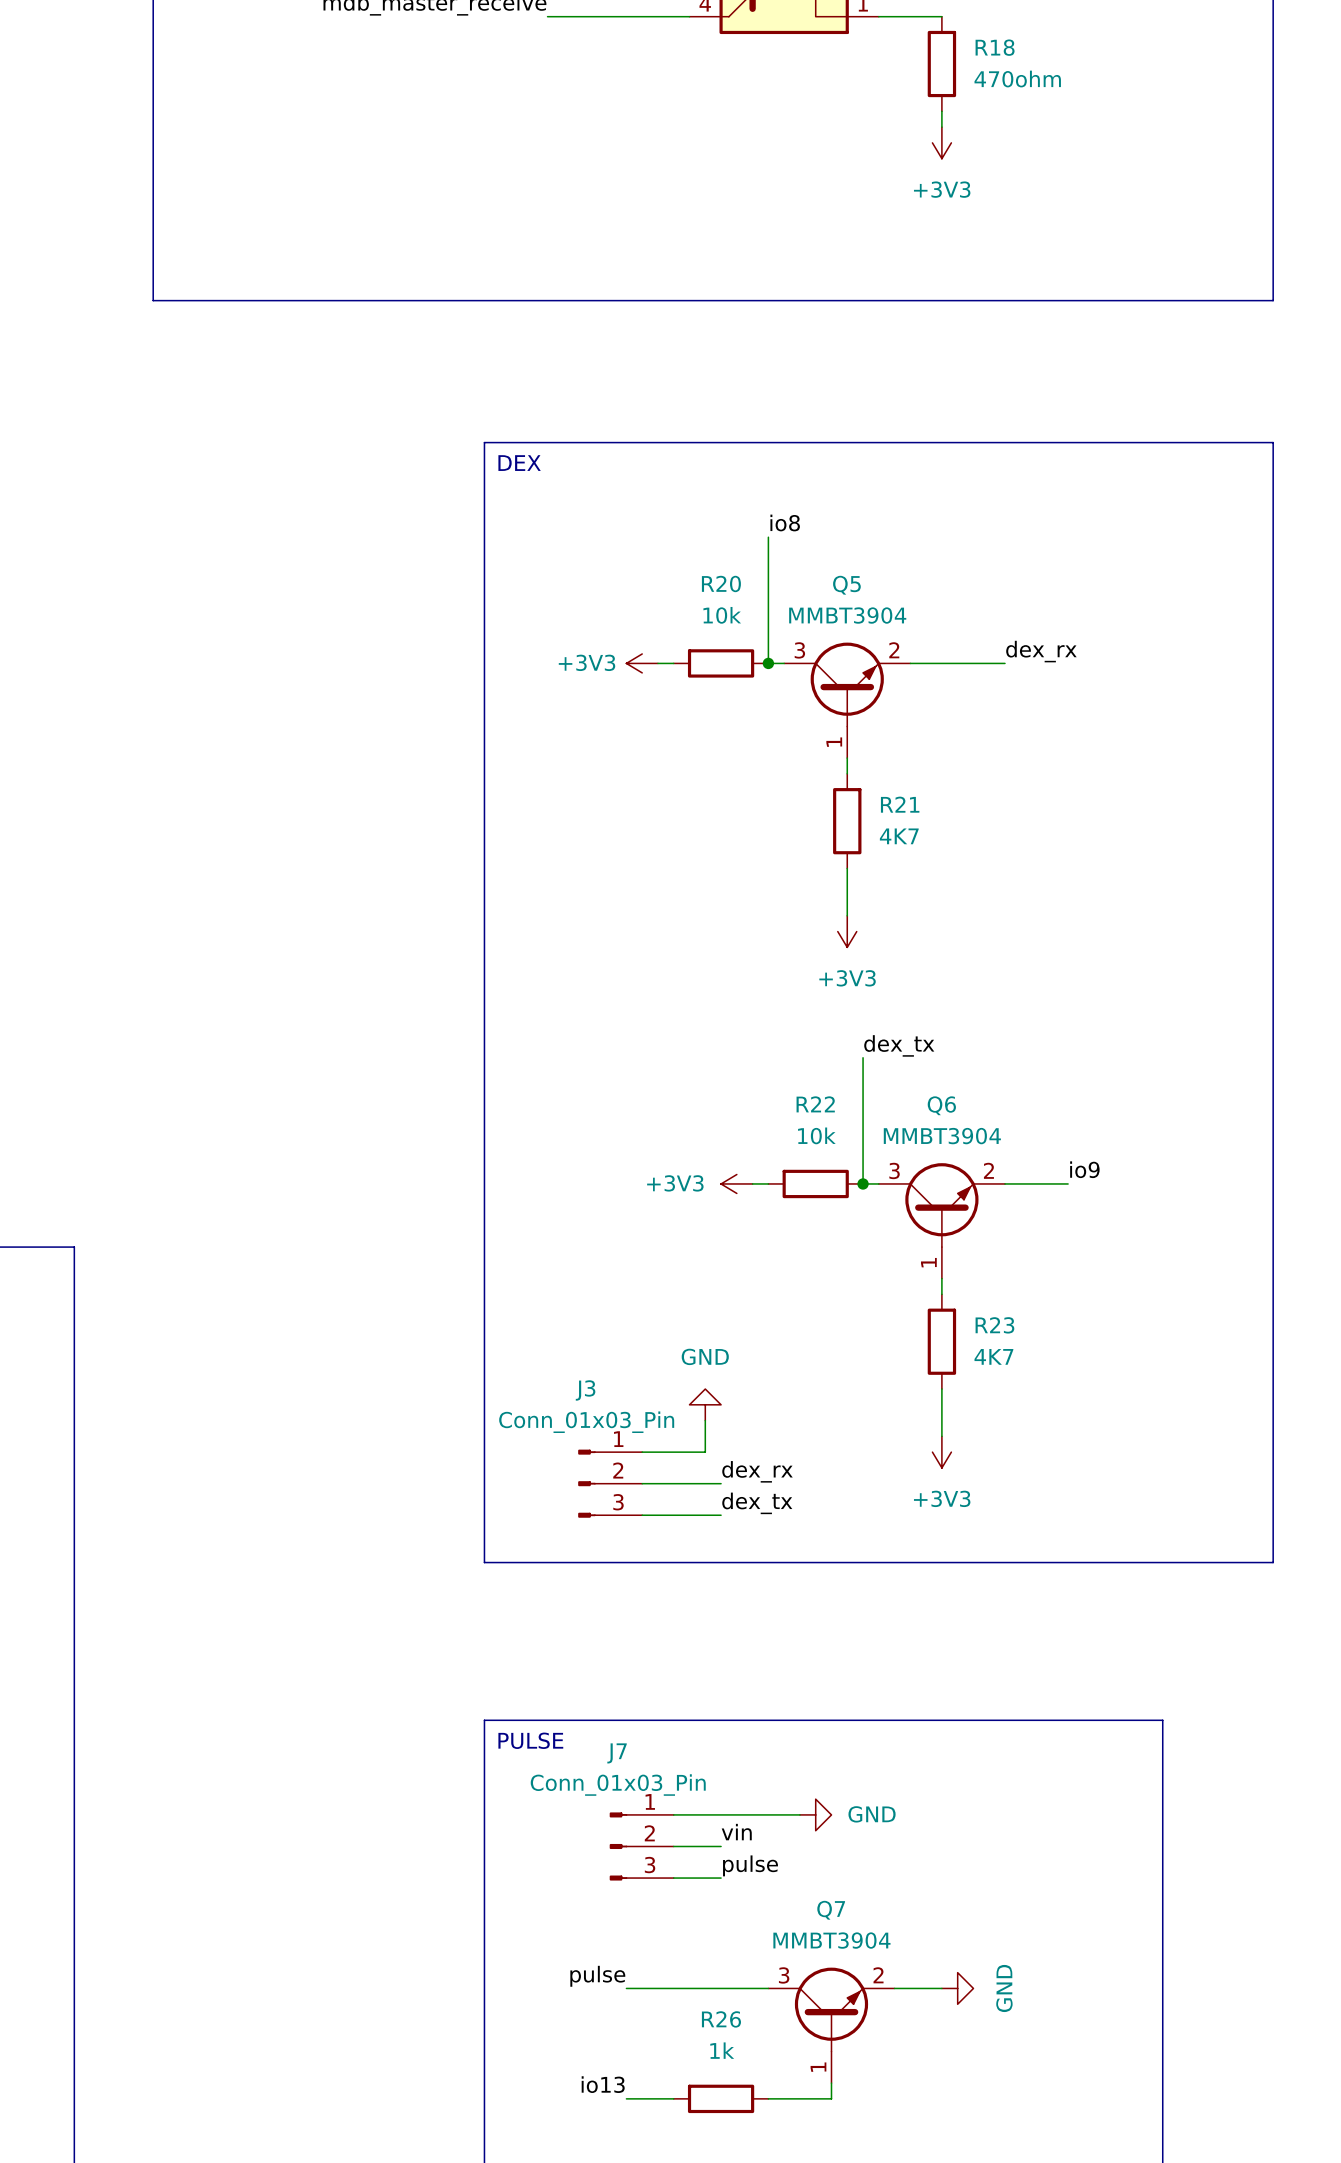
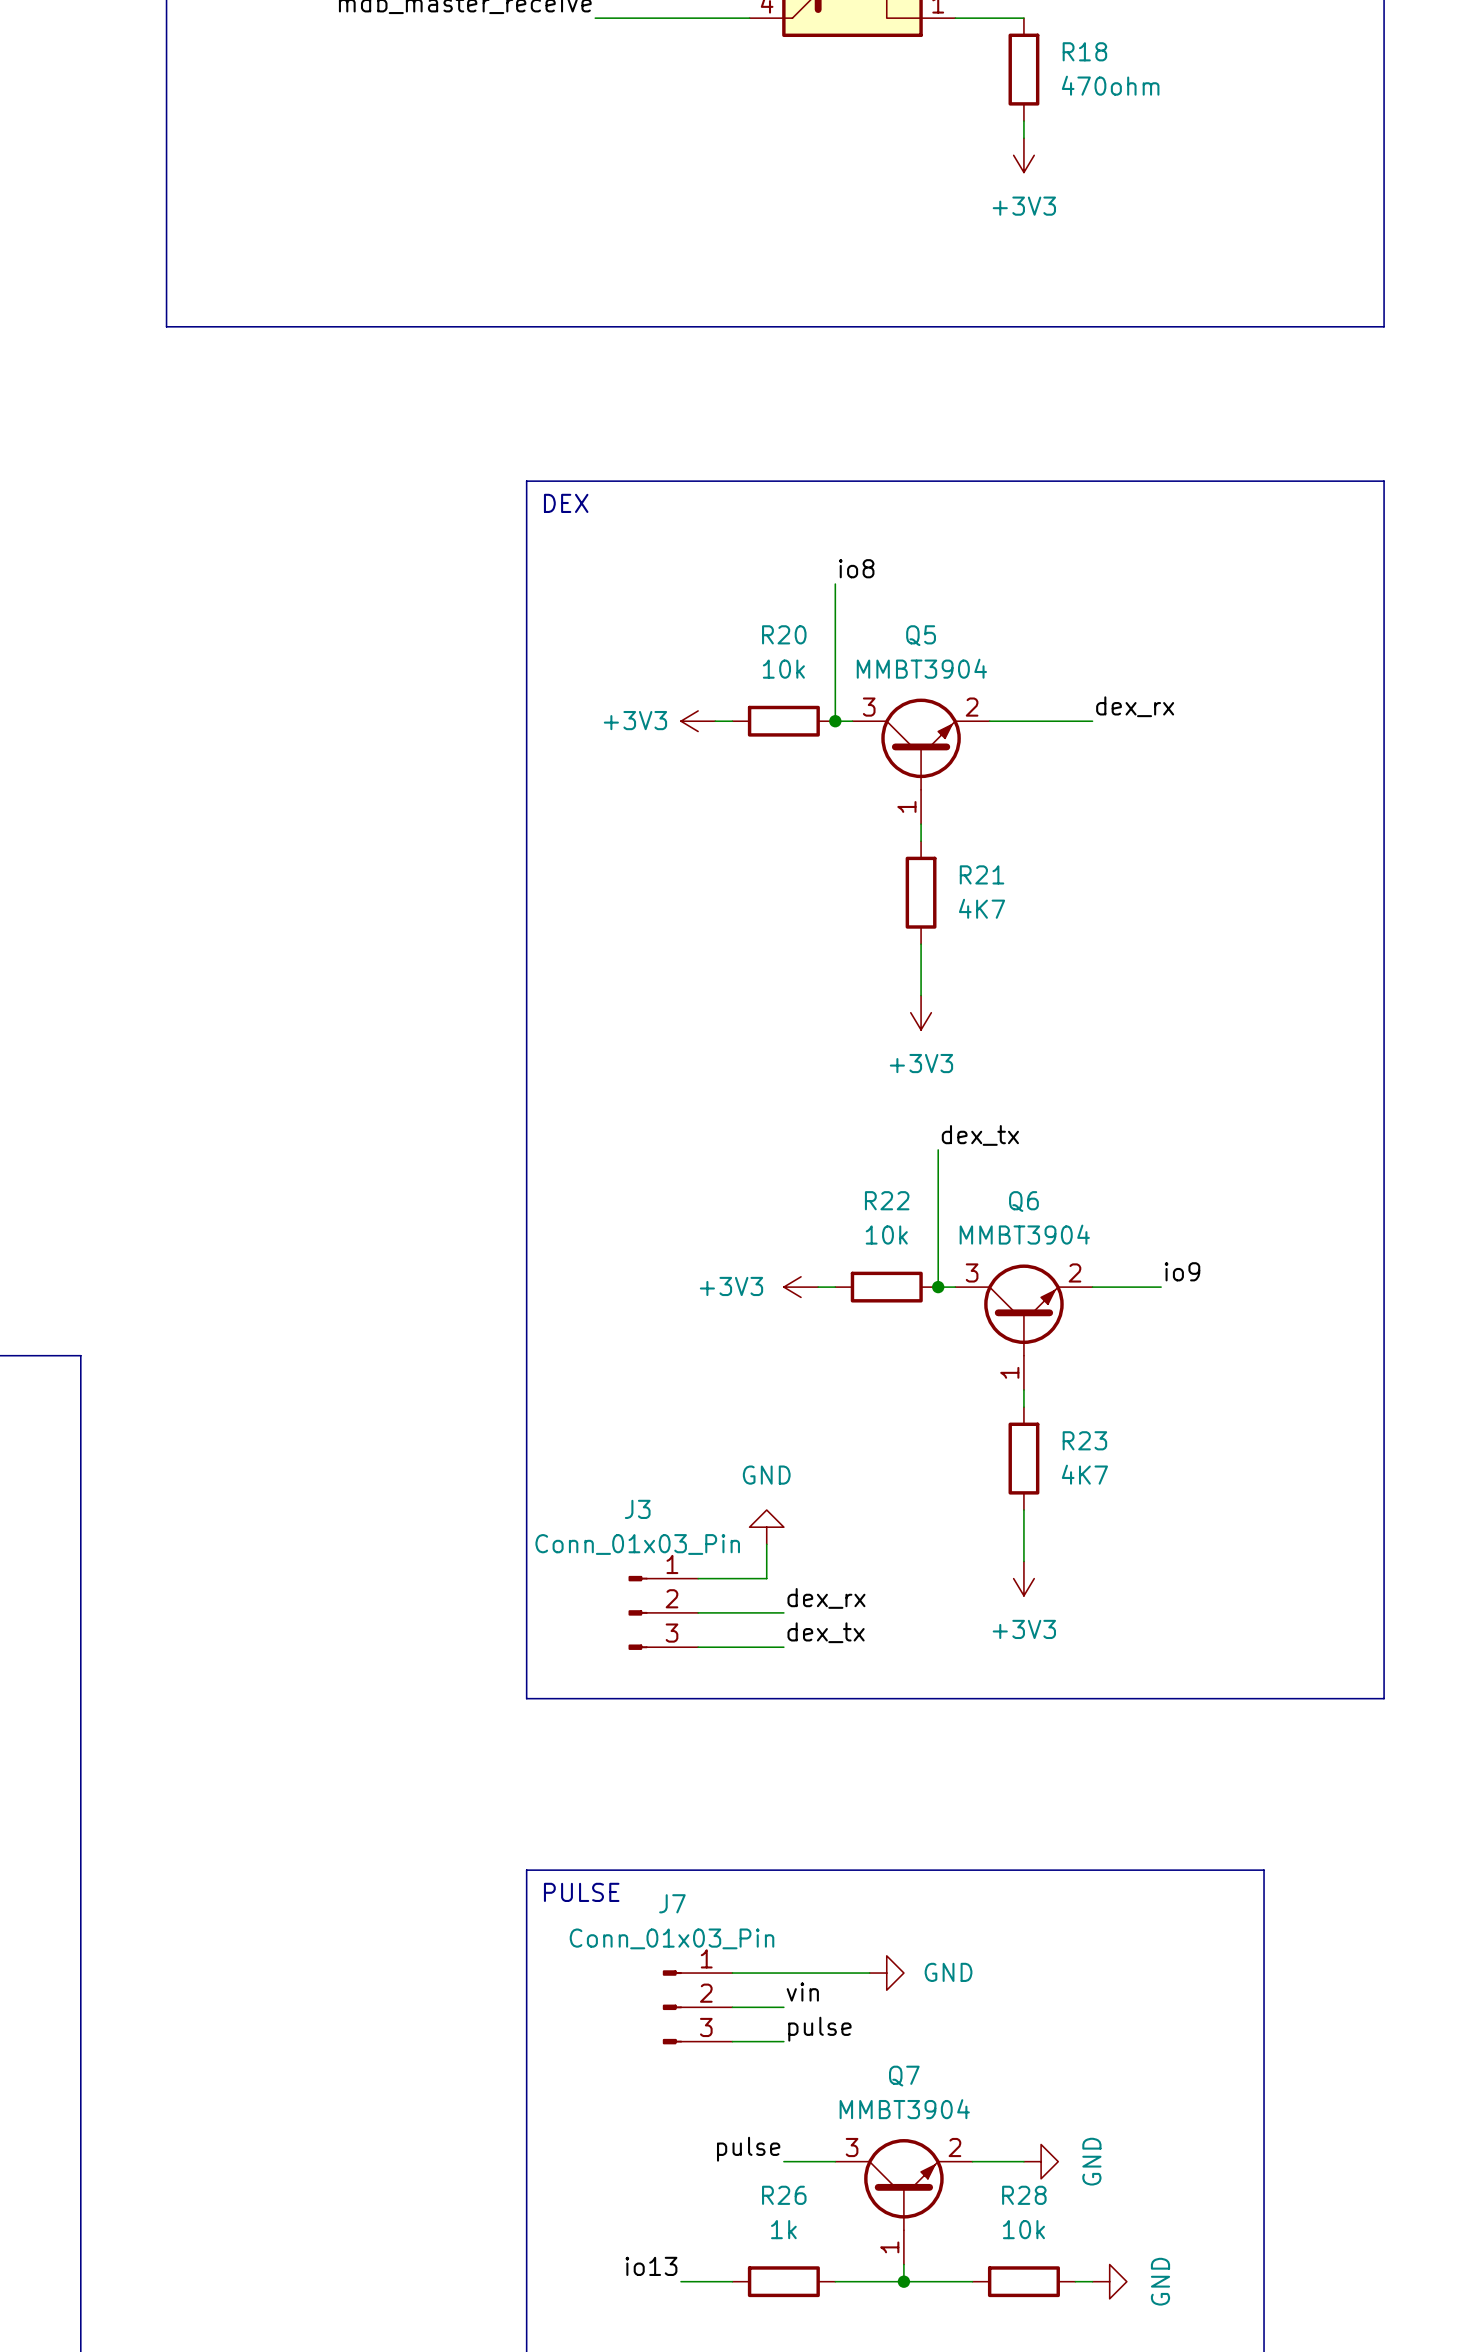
label position: pulse (597, 1976) -> pulse (748, 2149)
wire: (626, 1988) (721, 1988) -> none
wire: none -> (903, 2281) (972, 2281)
junction: none -> (903, 2281)
R28: none -> 10k (1023, 2281)
wire: none -> (1075, 2281) (1092, 2281)
power symbol: none -> GND (1109, 2281)

